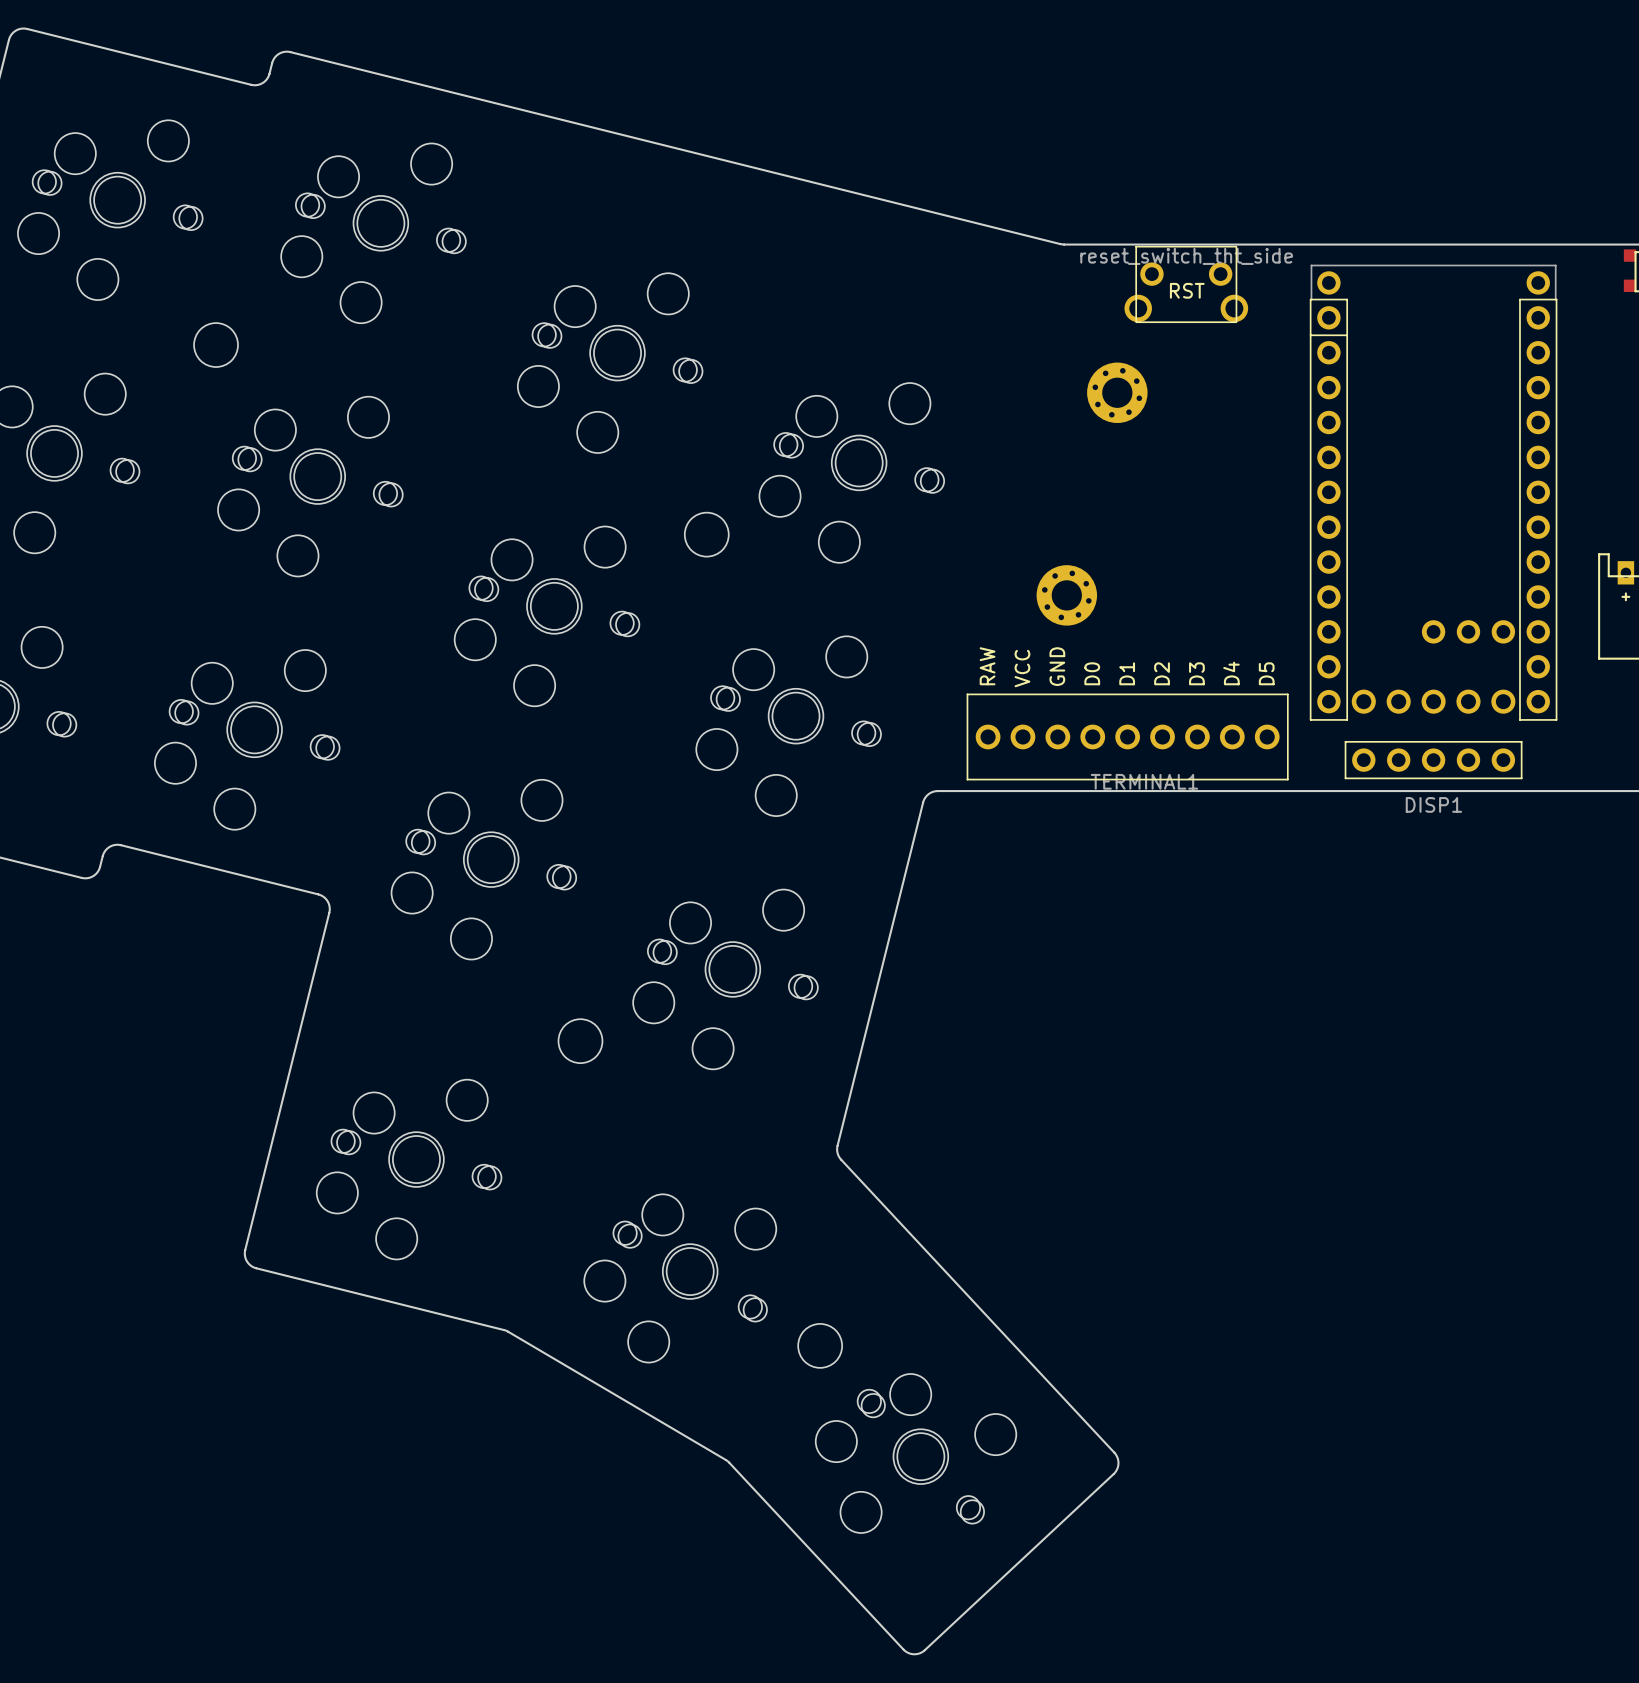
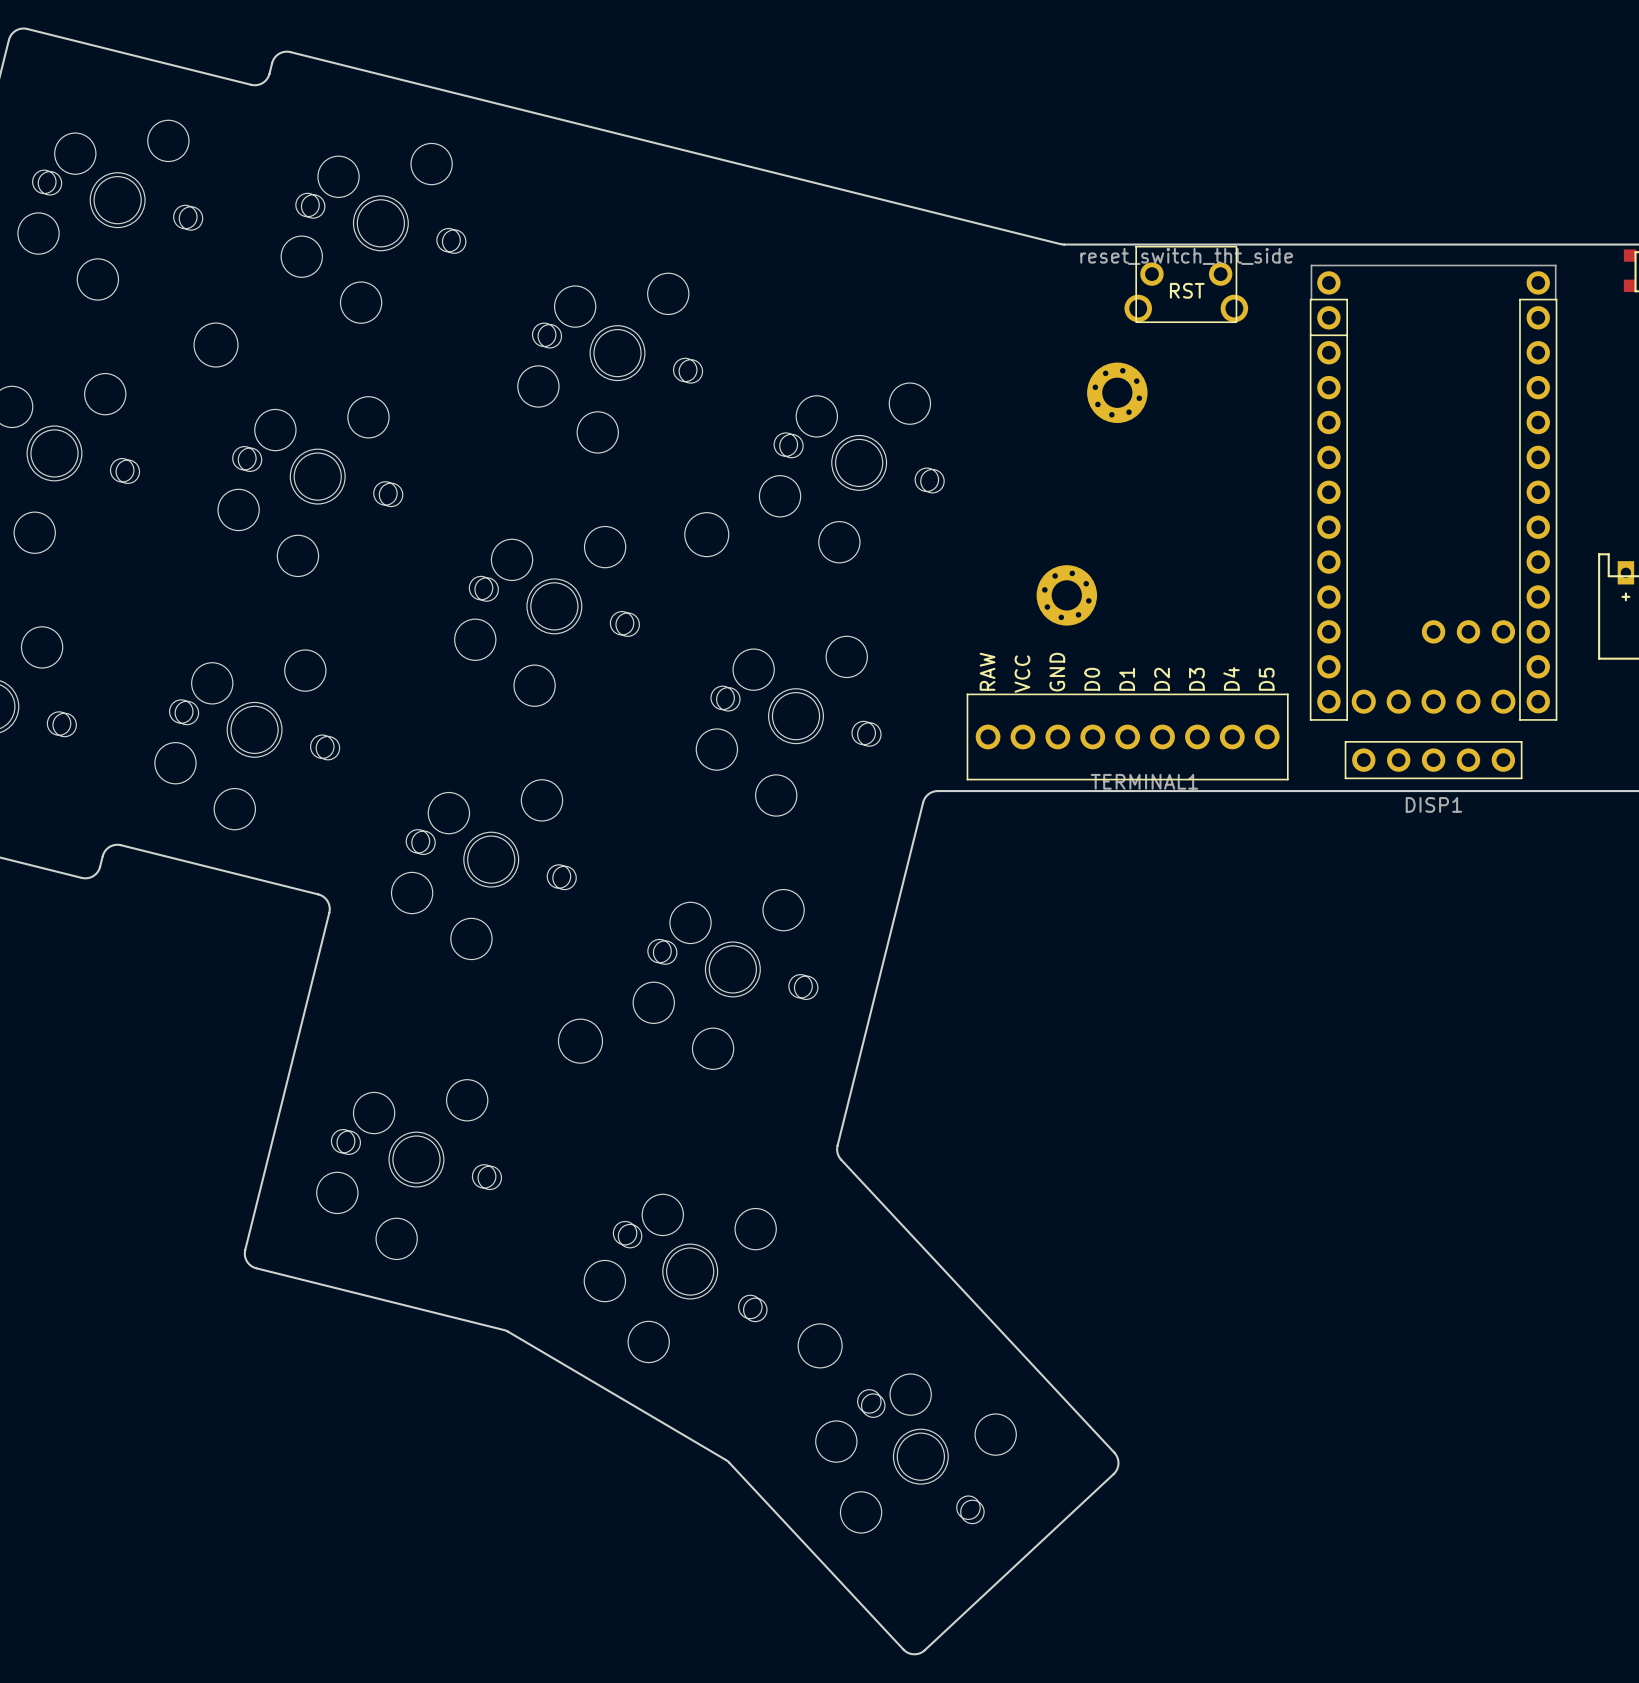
TERMINAL1 footprint: [966, 693, 1289, 781] -> [966, 693, 1289, 781]

